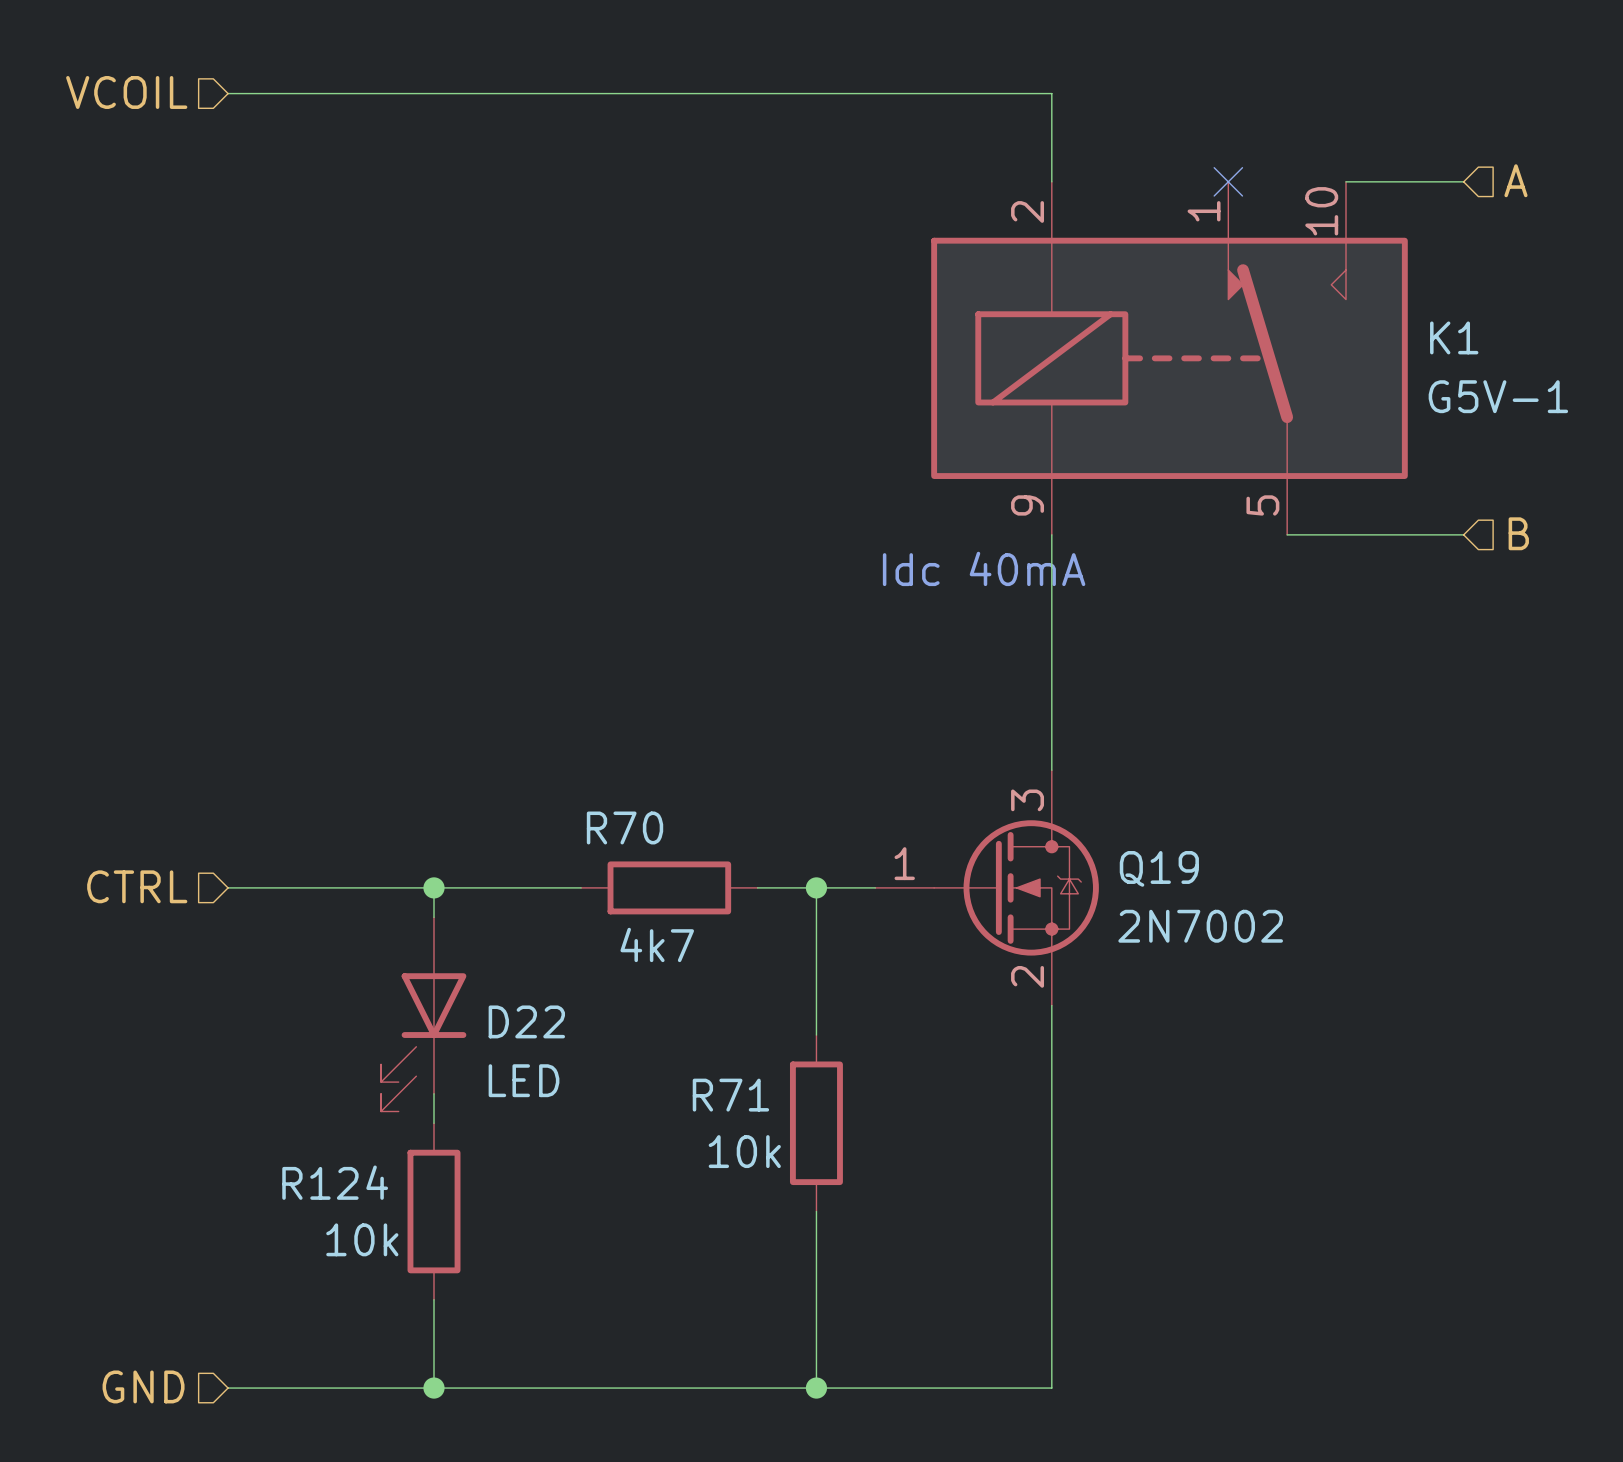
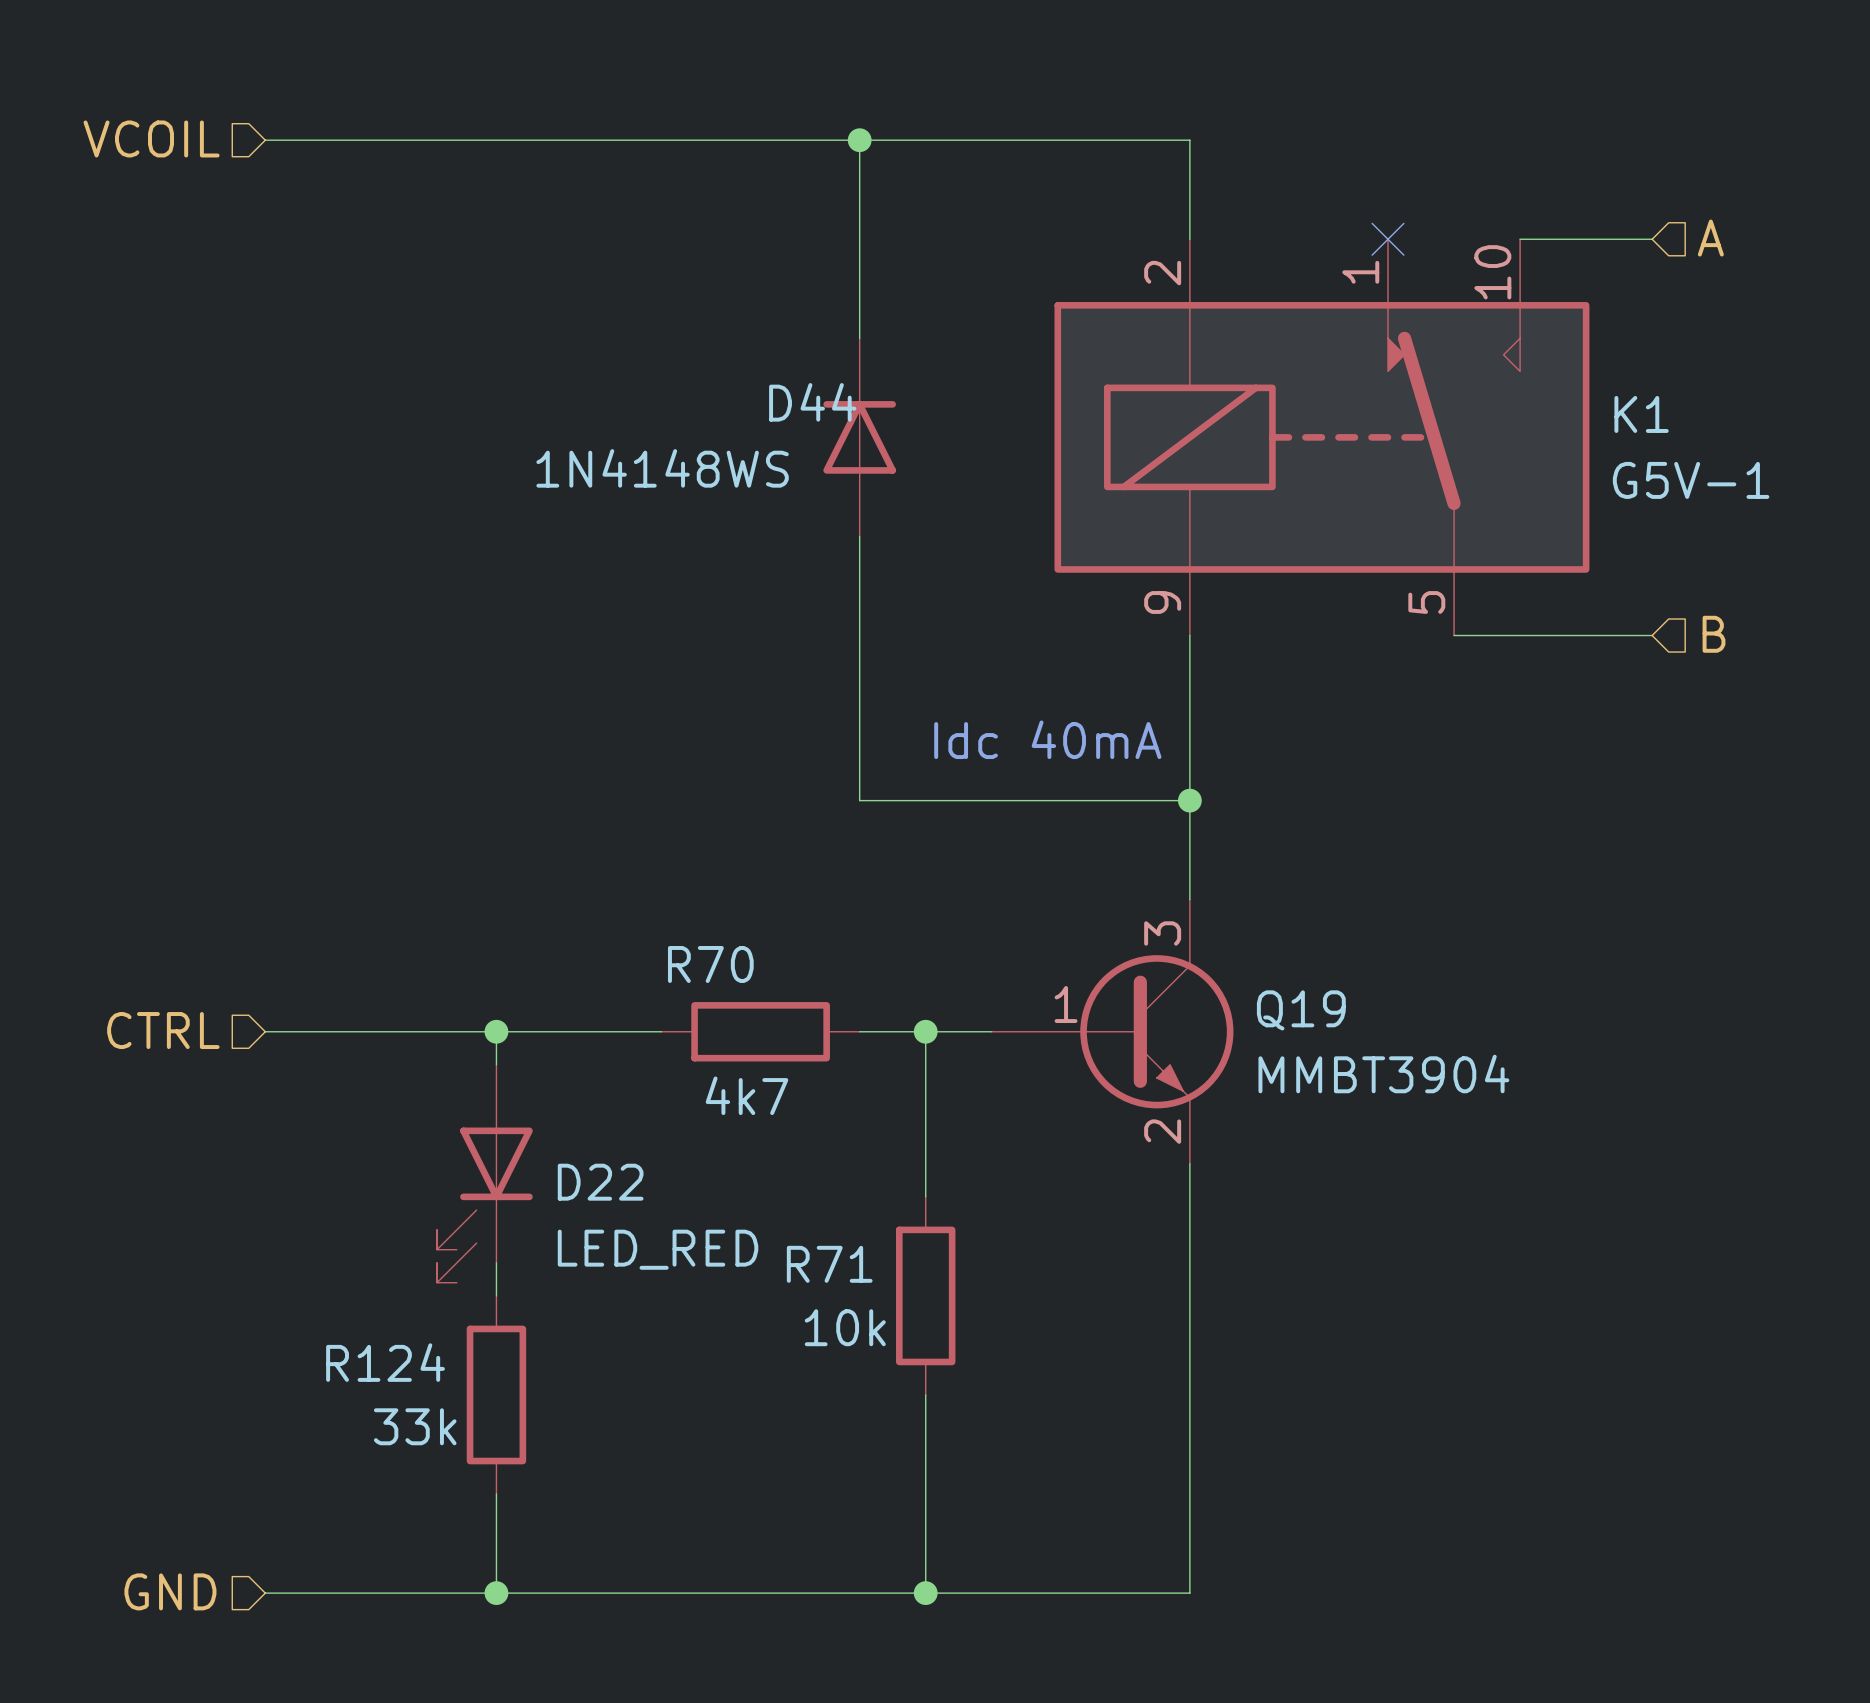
wire: none -> (859, 140) (859, 338)
junction: none -> (859, 140)
D44: none -> 1N4148WS (859, 437)
wire: none -> (859, 536) (859, 800) (1189, 800)
text position: Idc 40mA (984, 568) -> Idc 40mA (1047, 739)
junction: none -> (1189, 800)
Q19 symbol: [875, 770, 1099, 1006] -> [991, 899, 1234, 1164]
Q19 value: 2N7002 (1200, 926) -> MMBT3904 (1383, 1074)
D22 value: LED (524, 1080) -> LED_RED (658, 1249)
R124 value: 10k (362, 1239) -> 33k (415, 1426)

